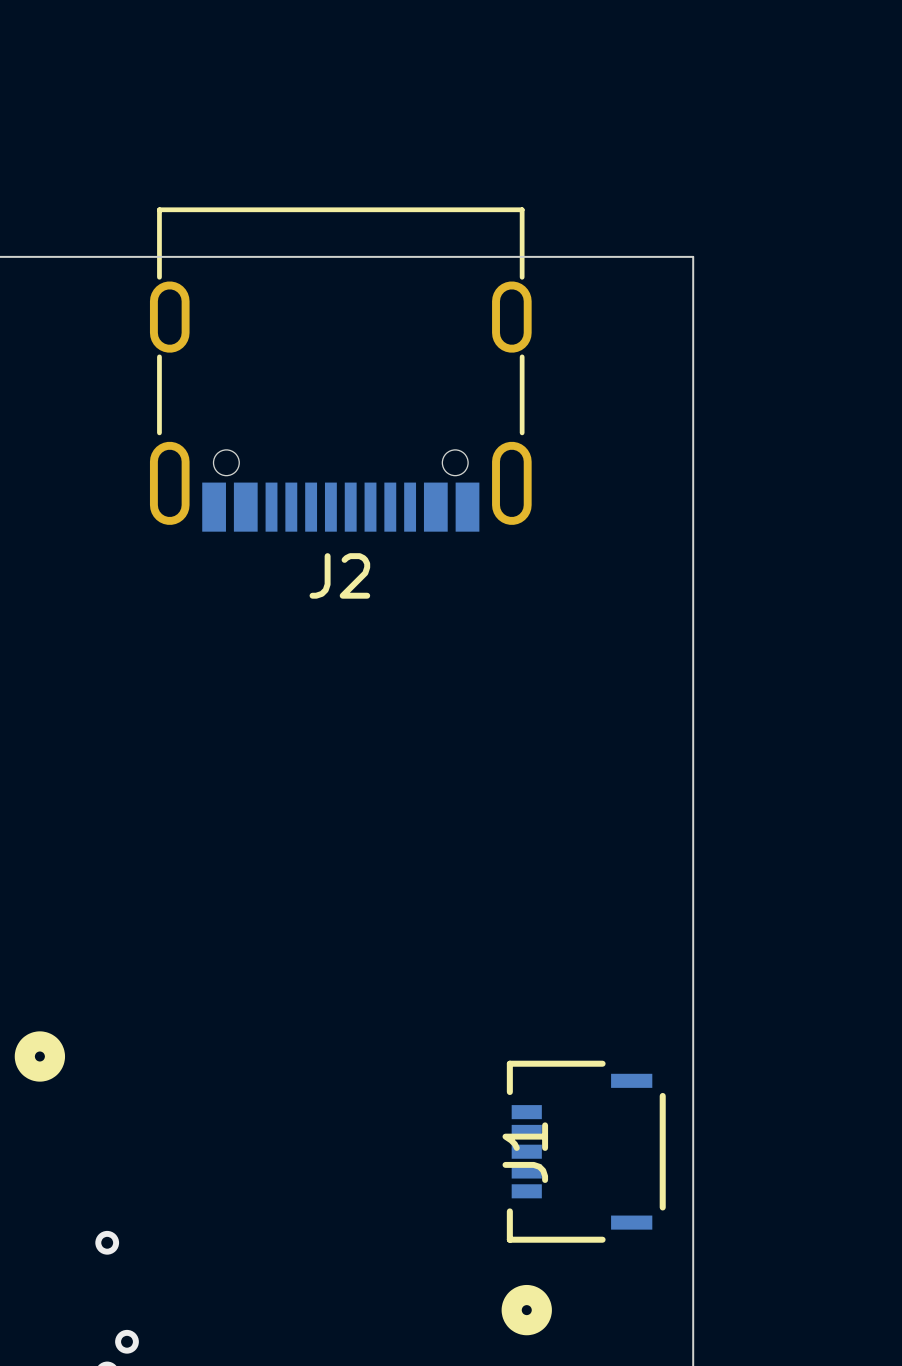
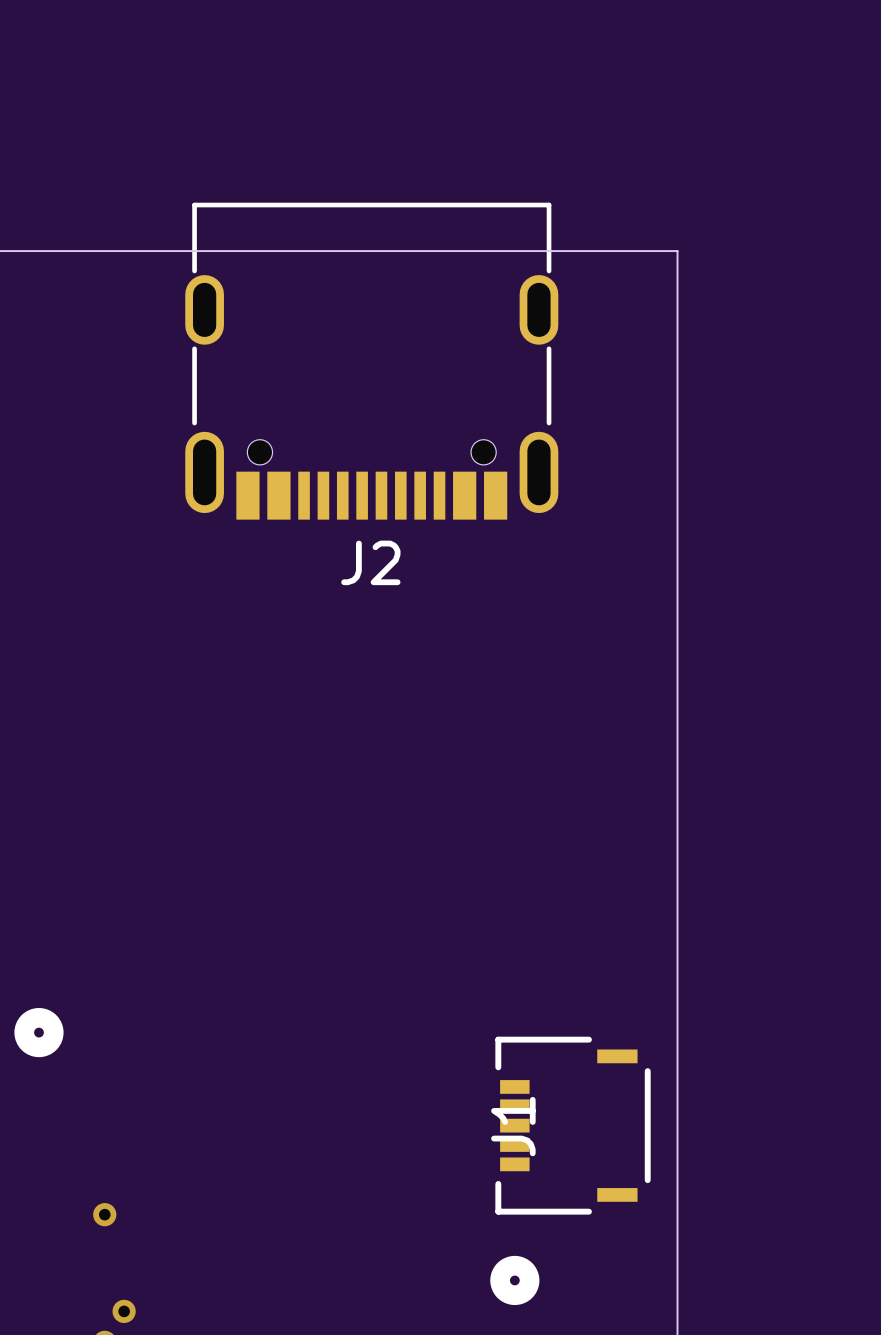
J2 position: (340, 369) -> (371, 361)

